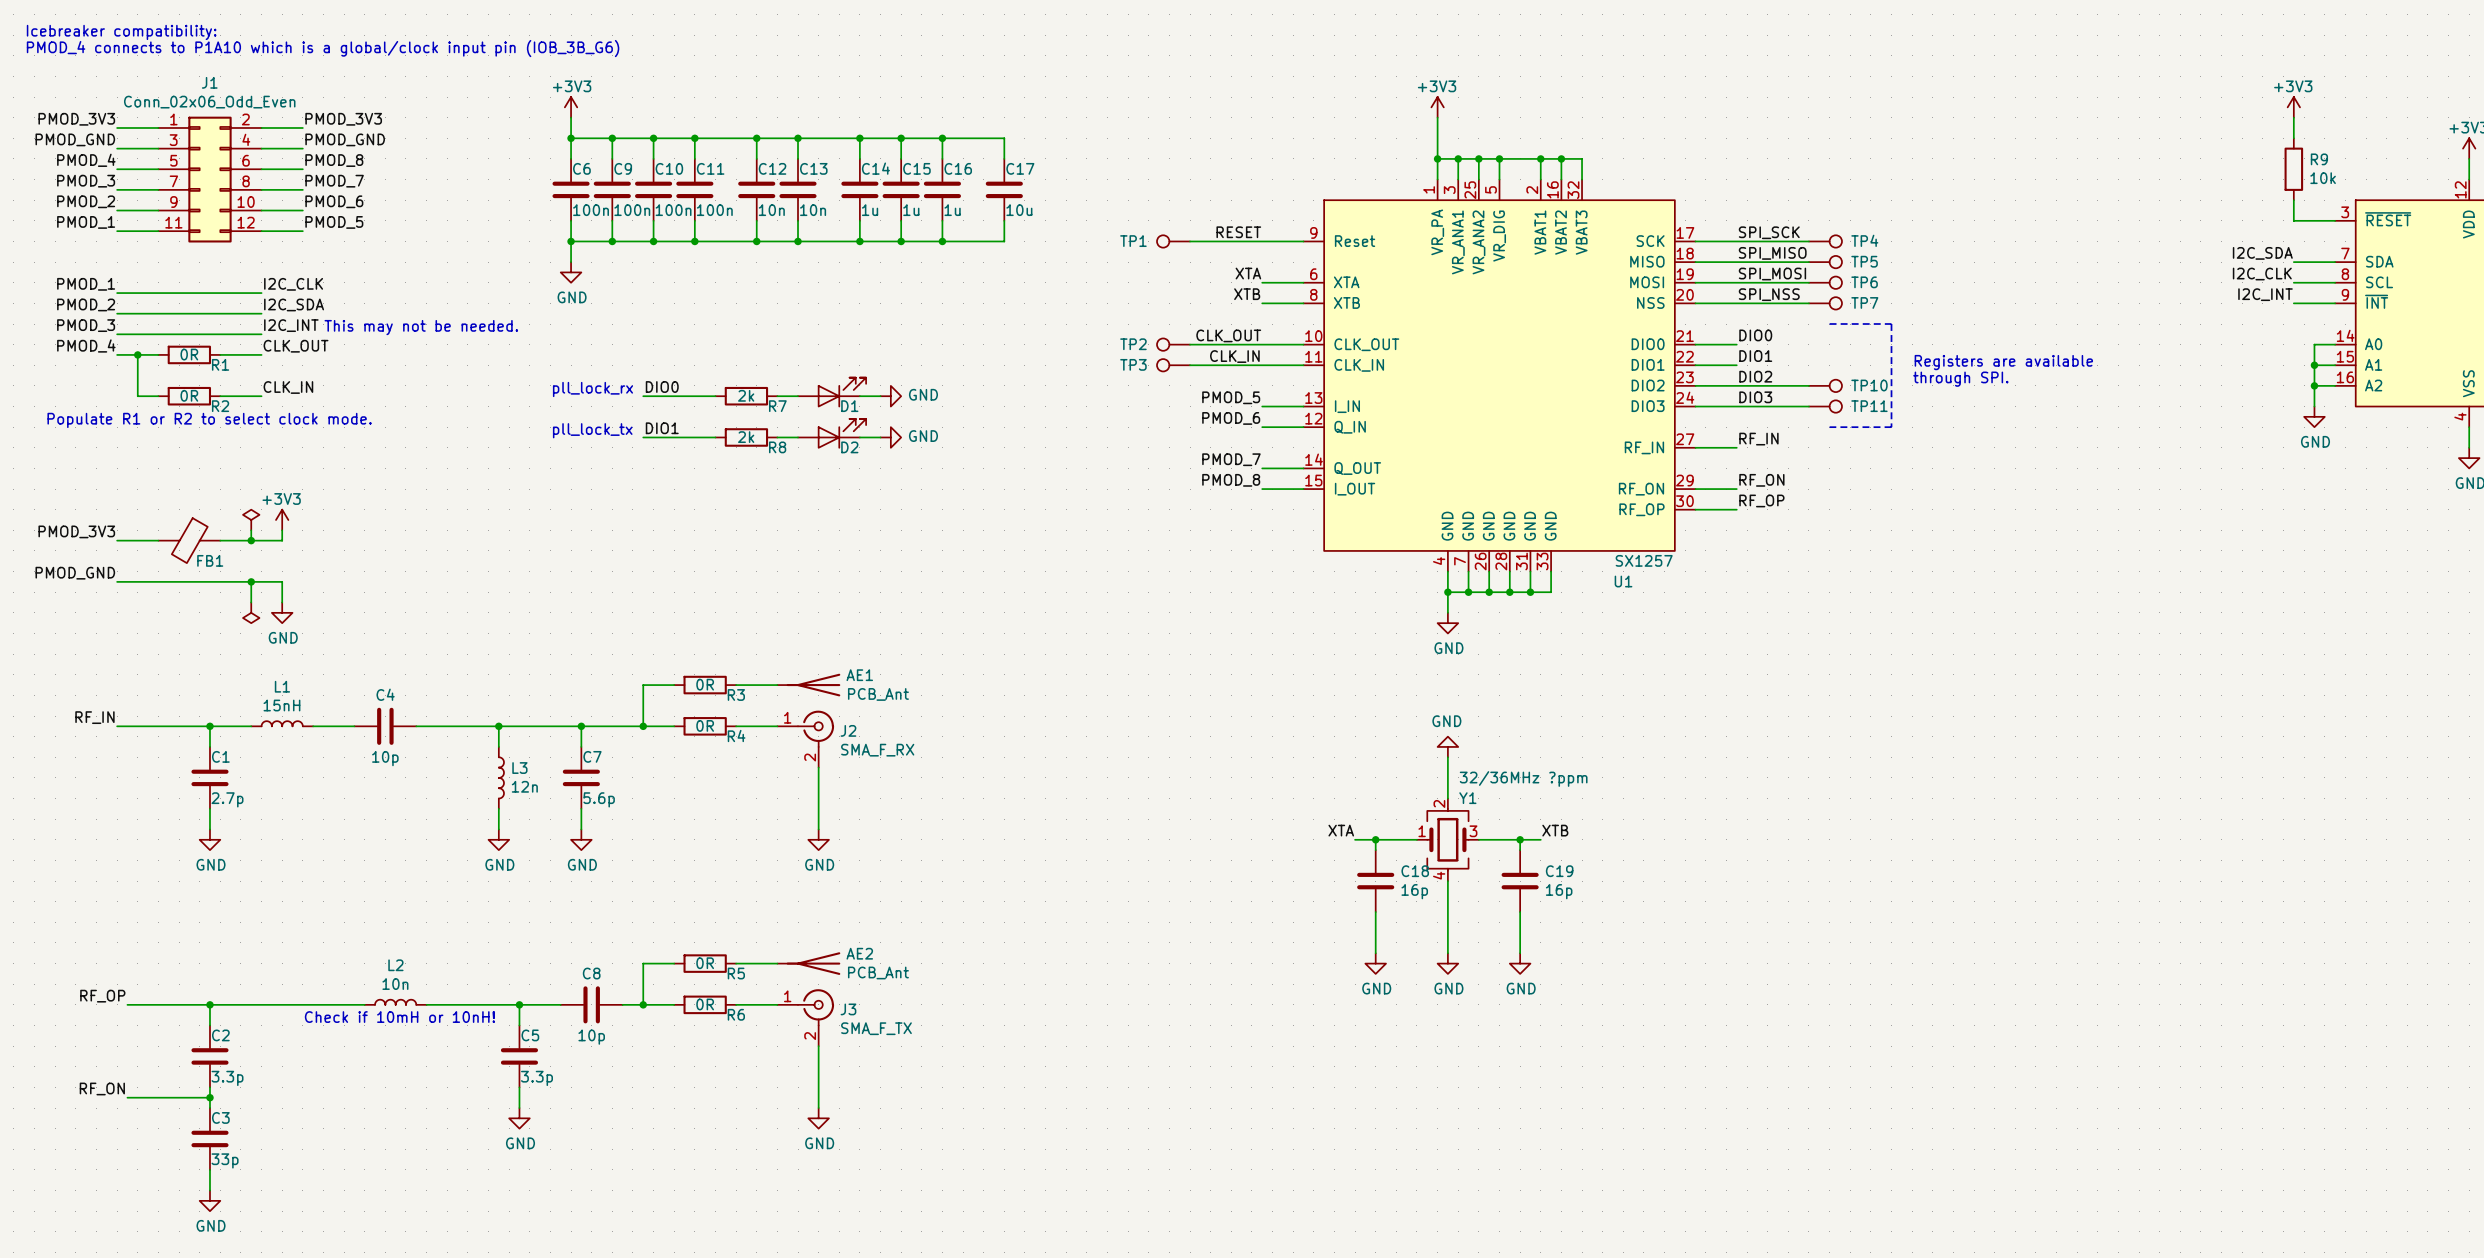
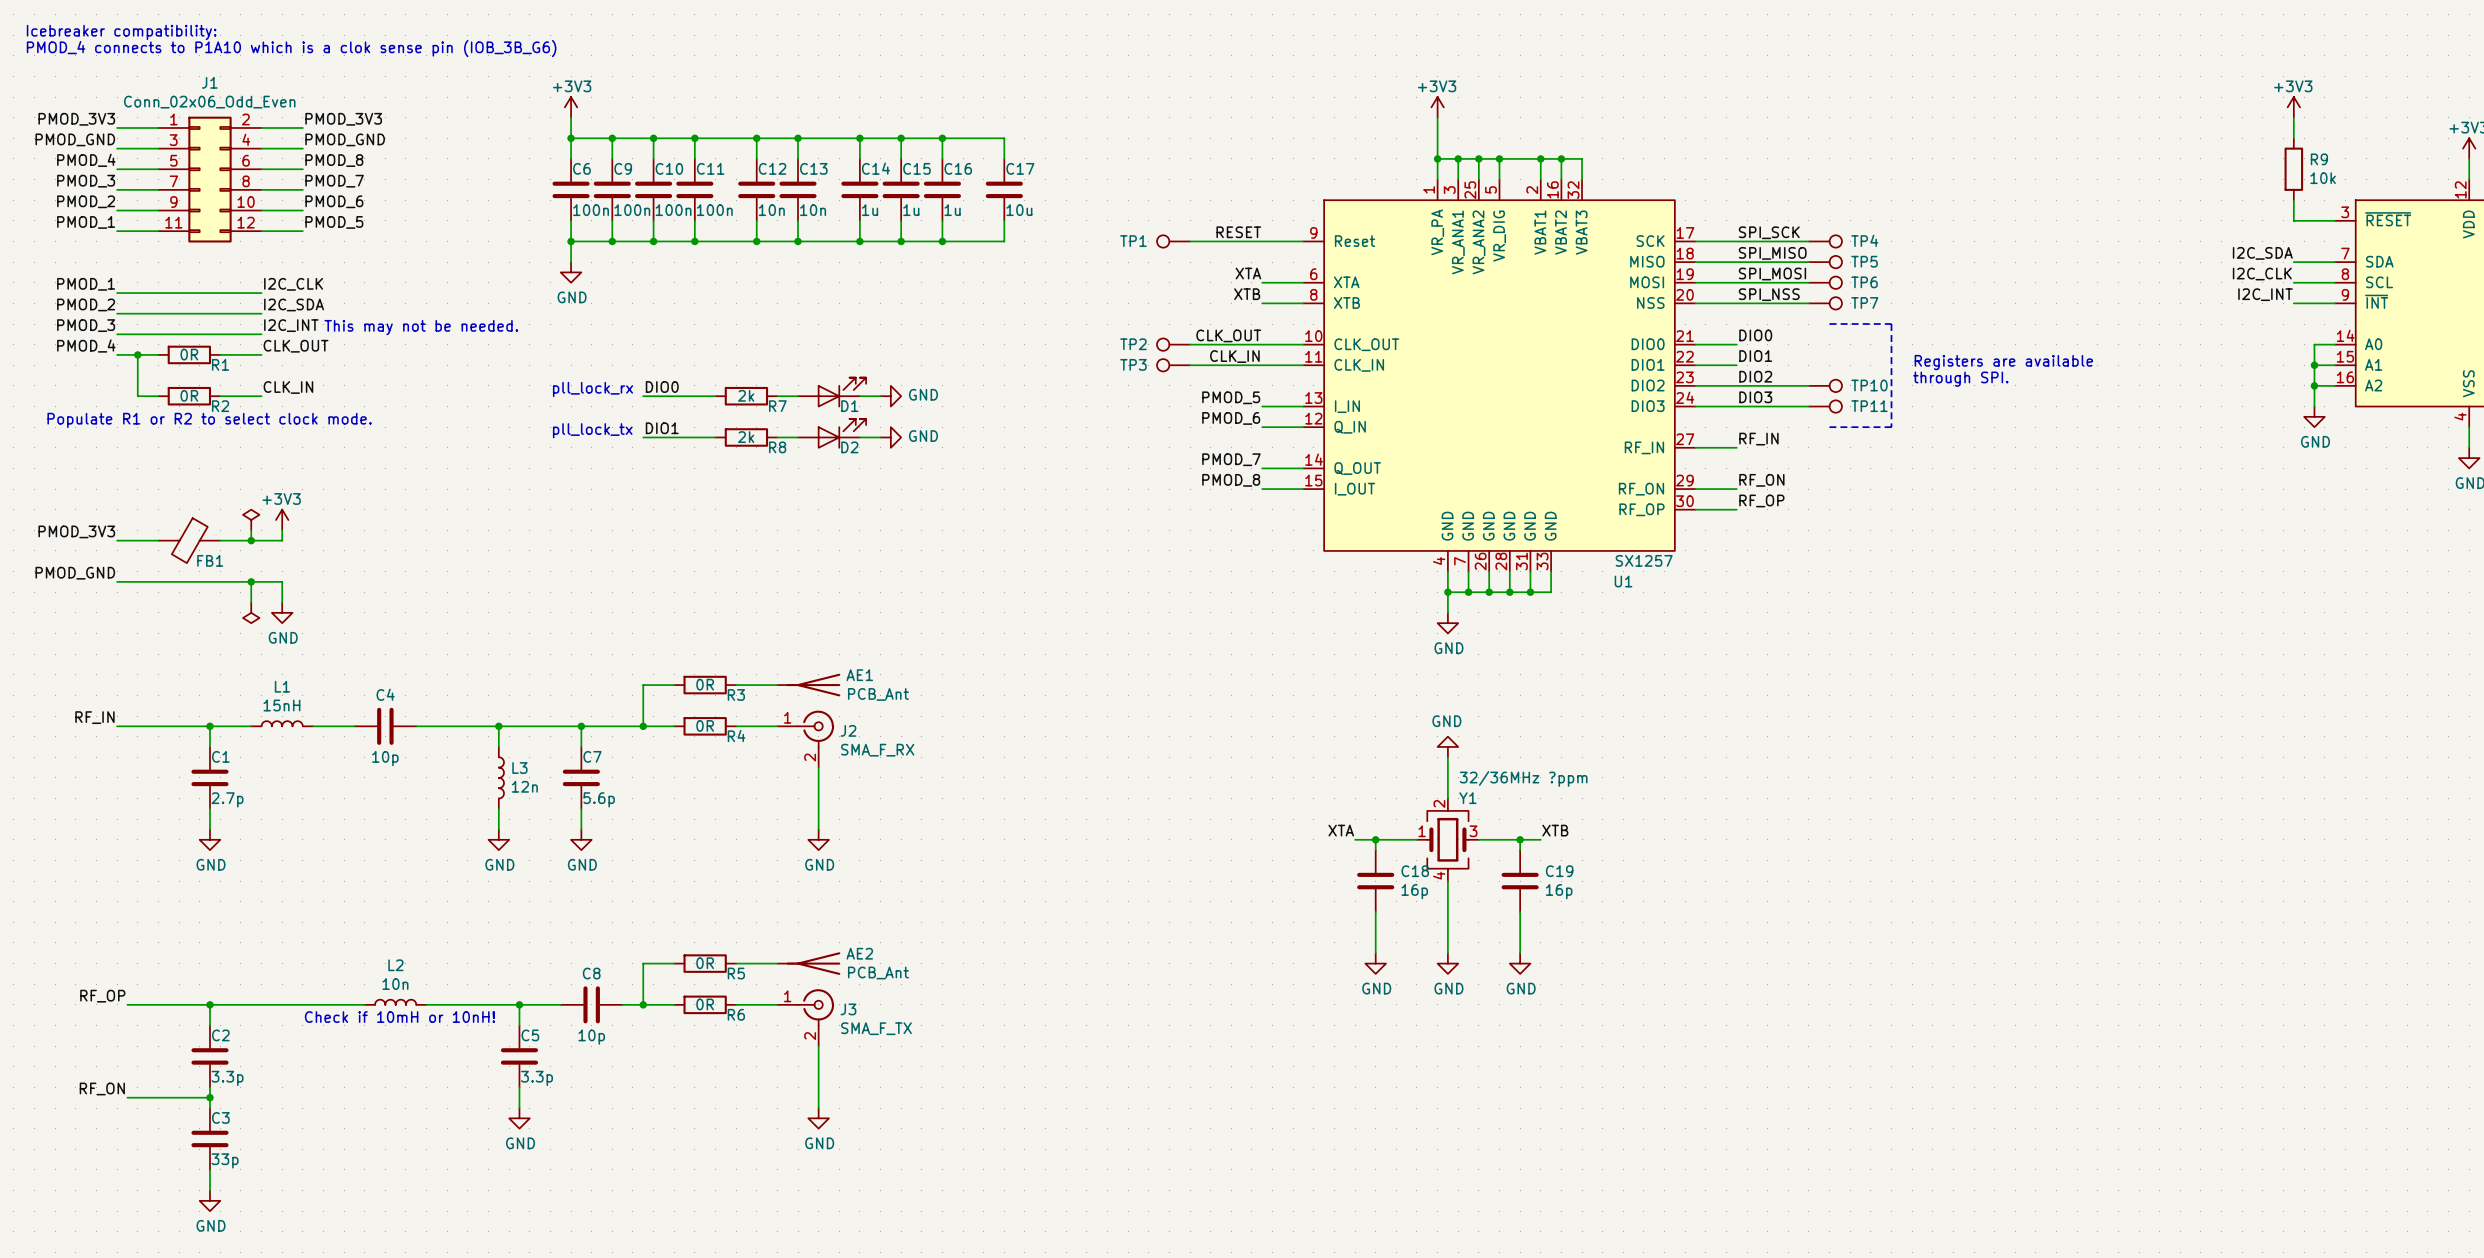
text: PMOD_4 connects to P1A10 which is a global/clock input pin (IOB_3B_G6) (323, 48) -> PMOD_4 connects to P1A10 which is a clok sense pin (IOB_3B_G6) (291, 48)

